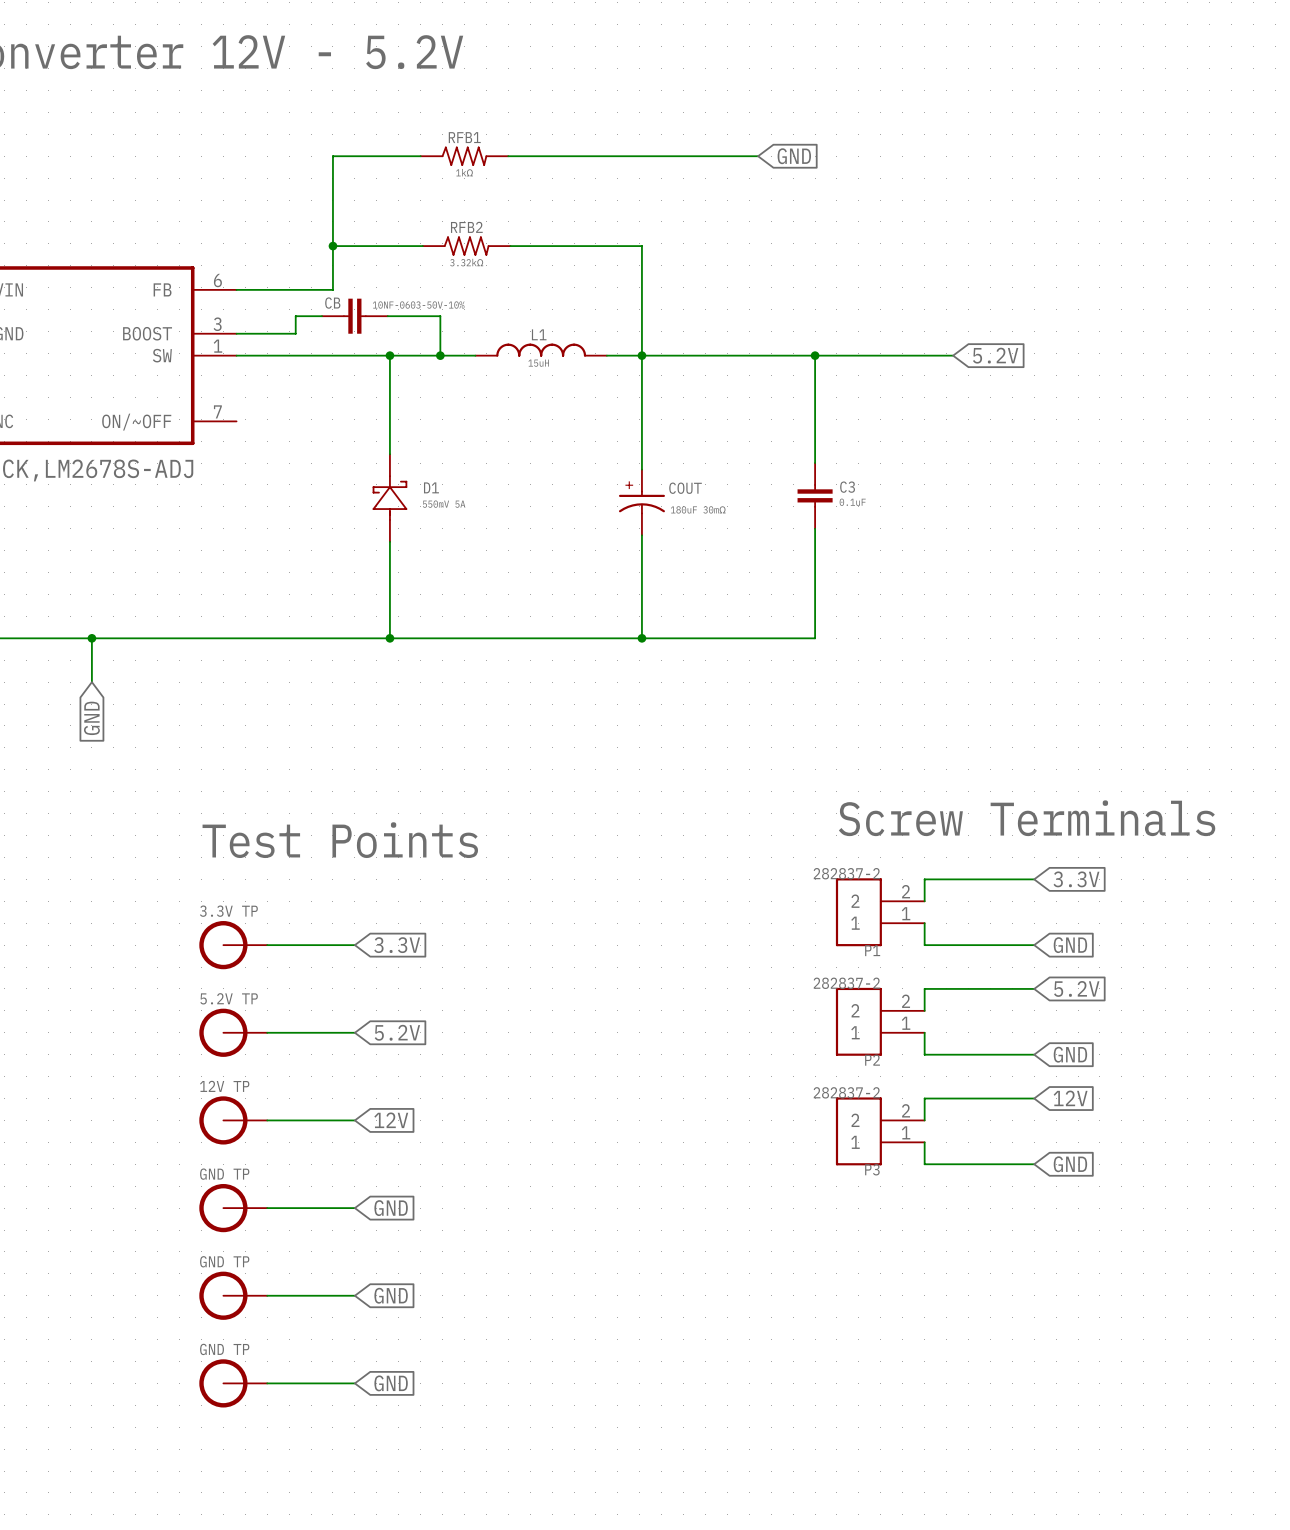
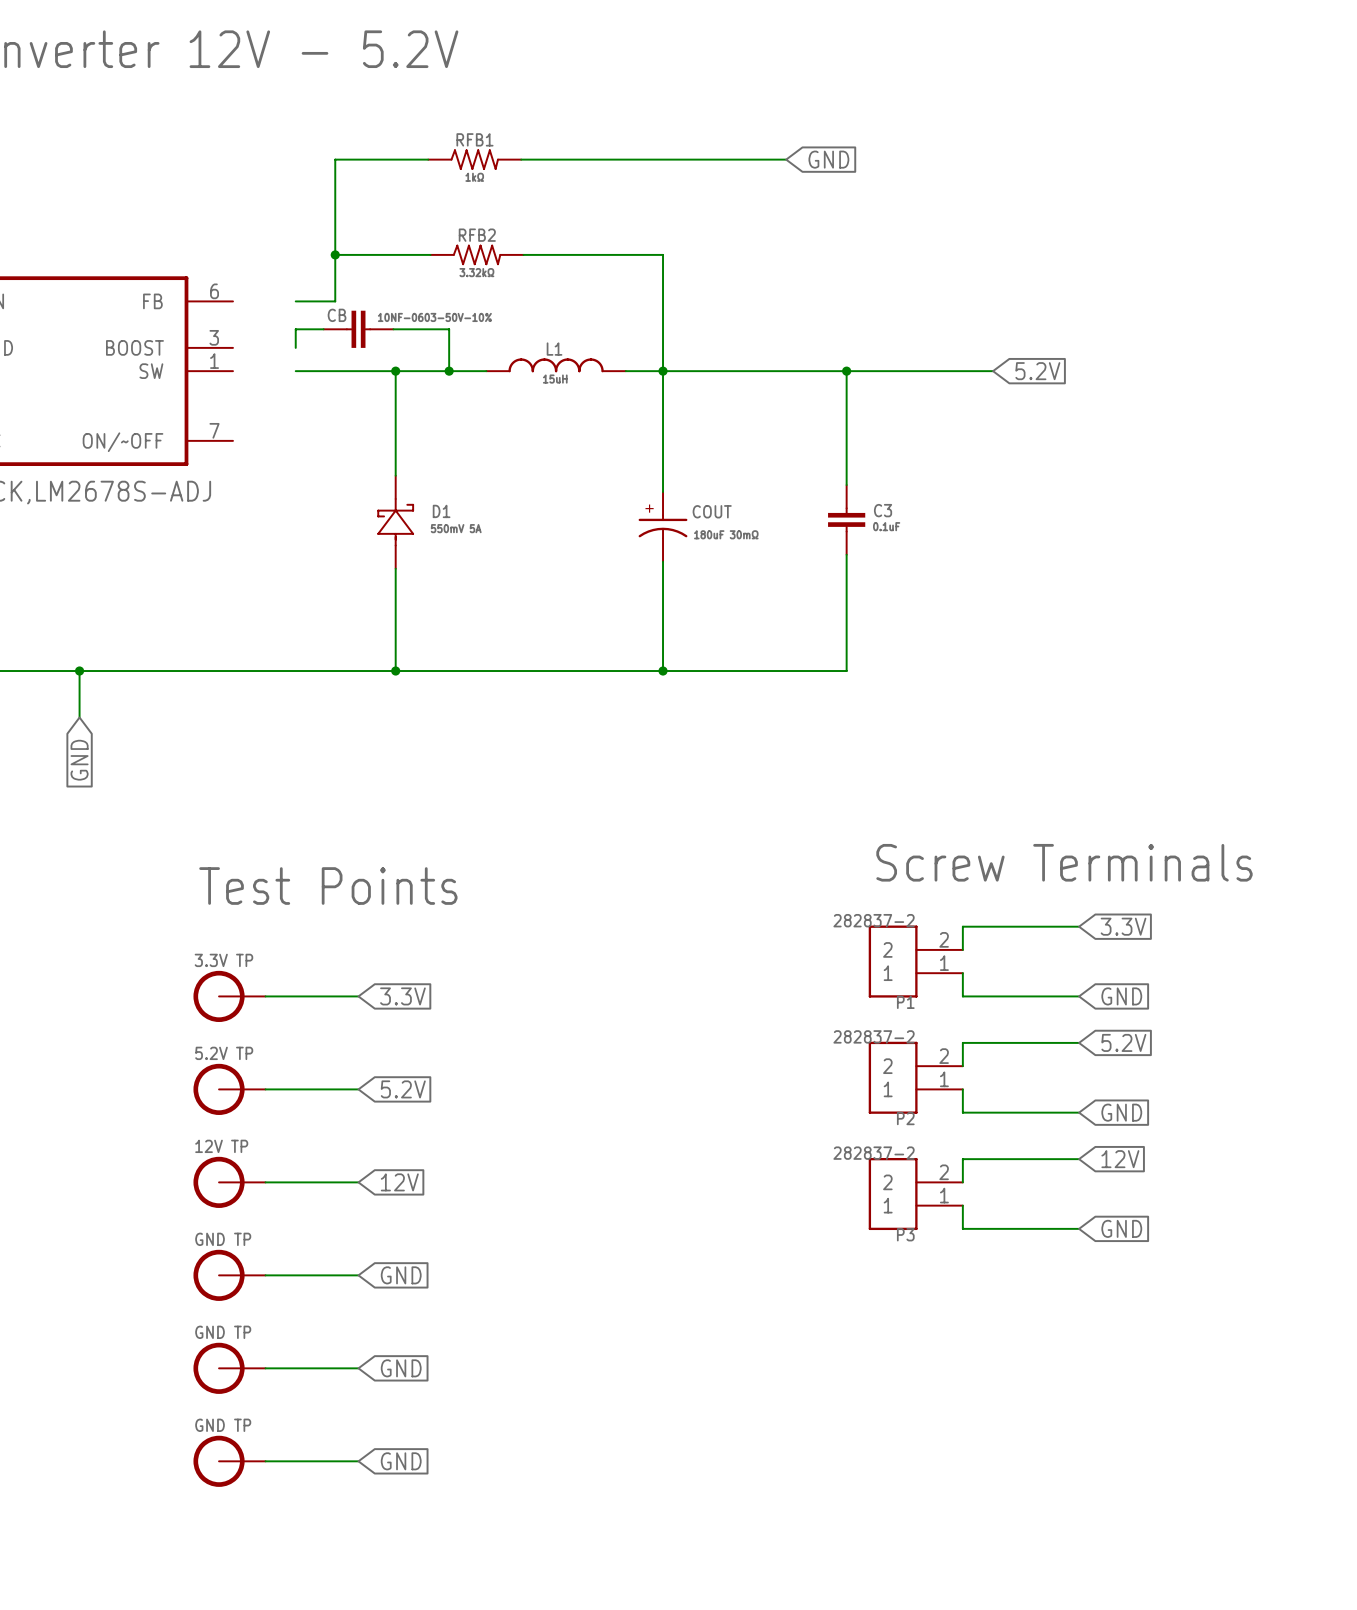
wire: (236, 289) (295, 289) -> none
wire: (236, 333) (295, 333) -> none
wire: (236, 355) (295, 355) -> none

